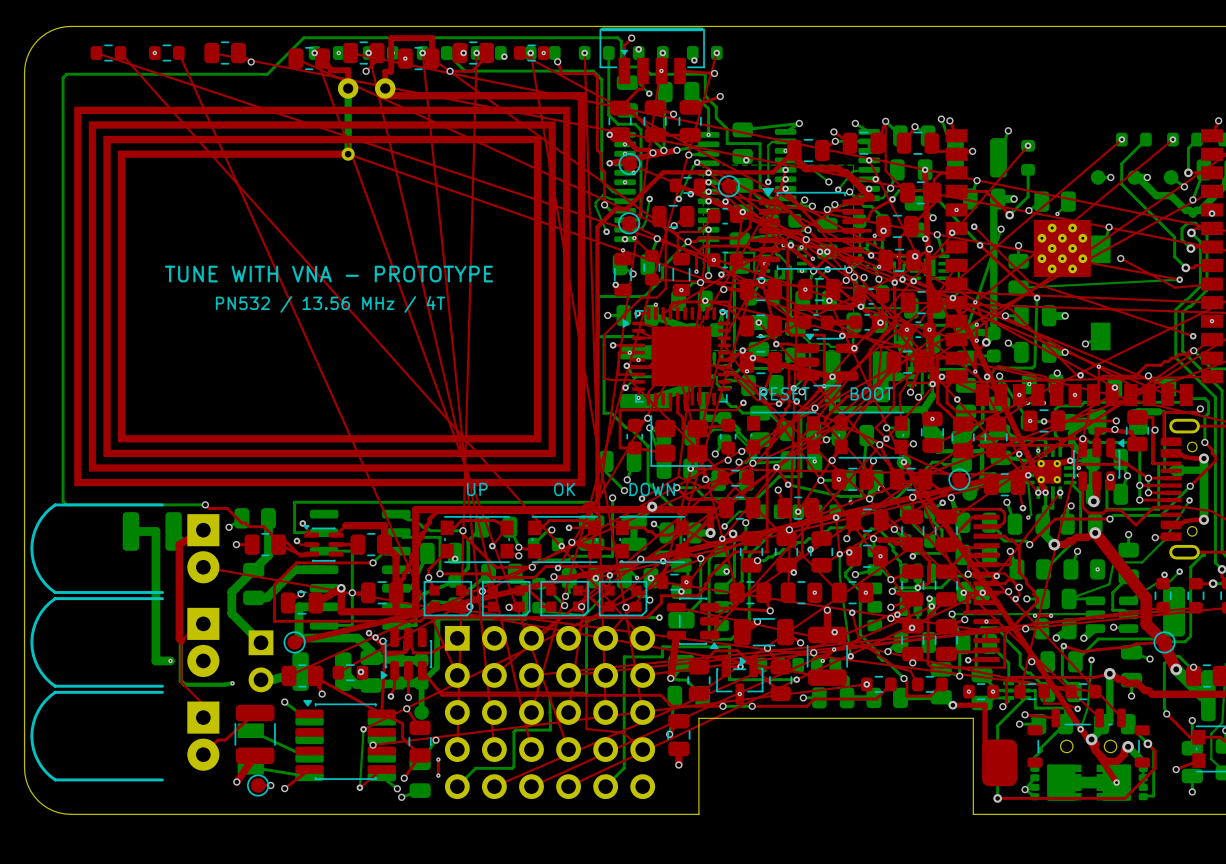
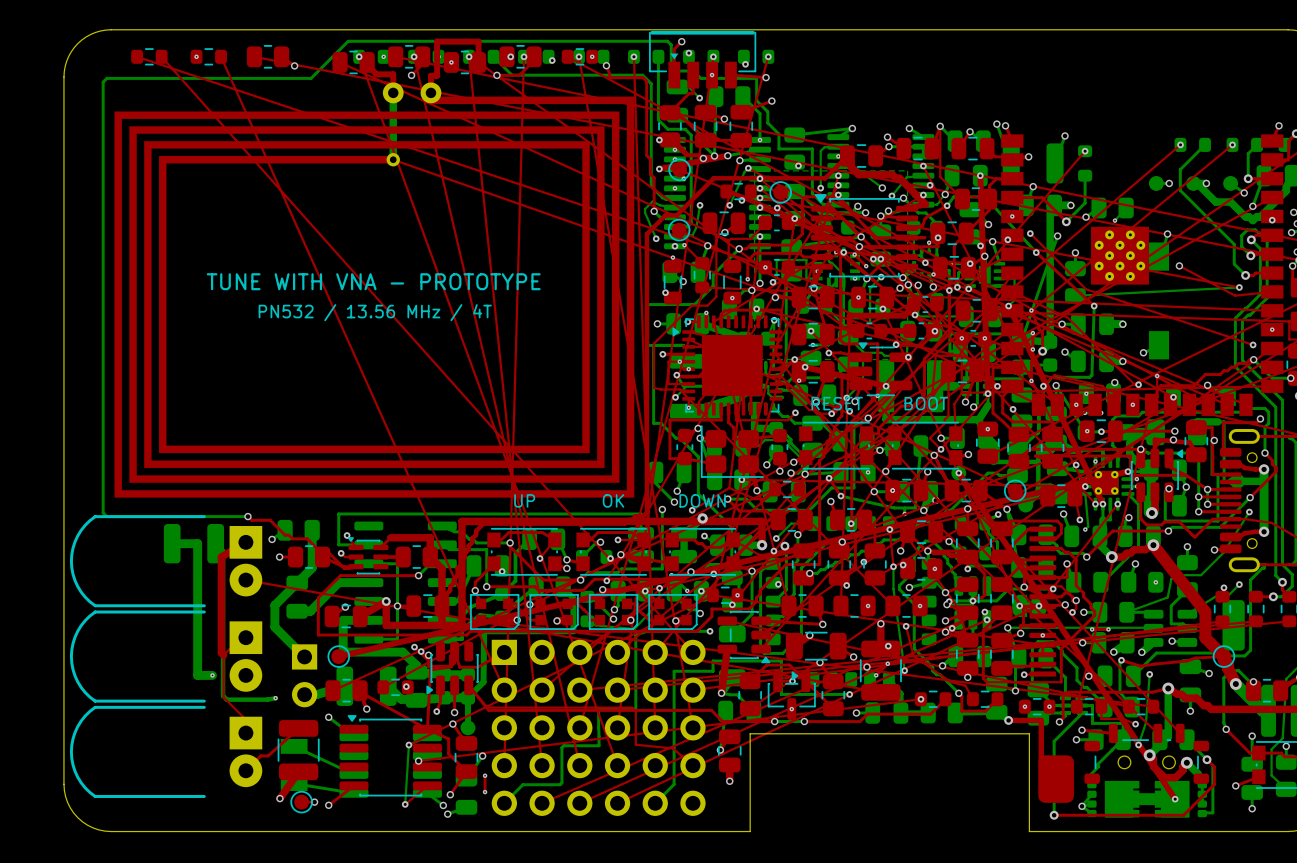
via position: (912, 627) -> (949, 601)

